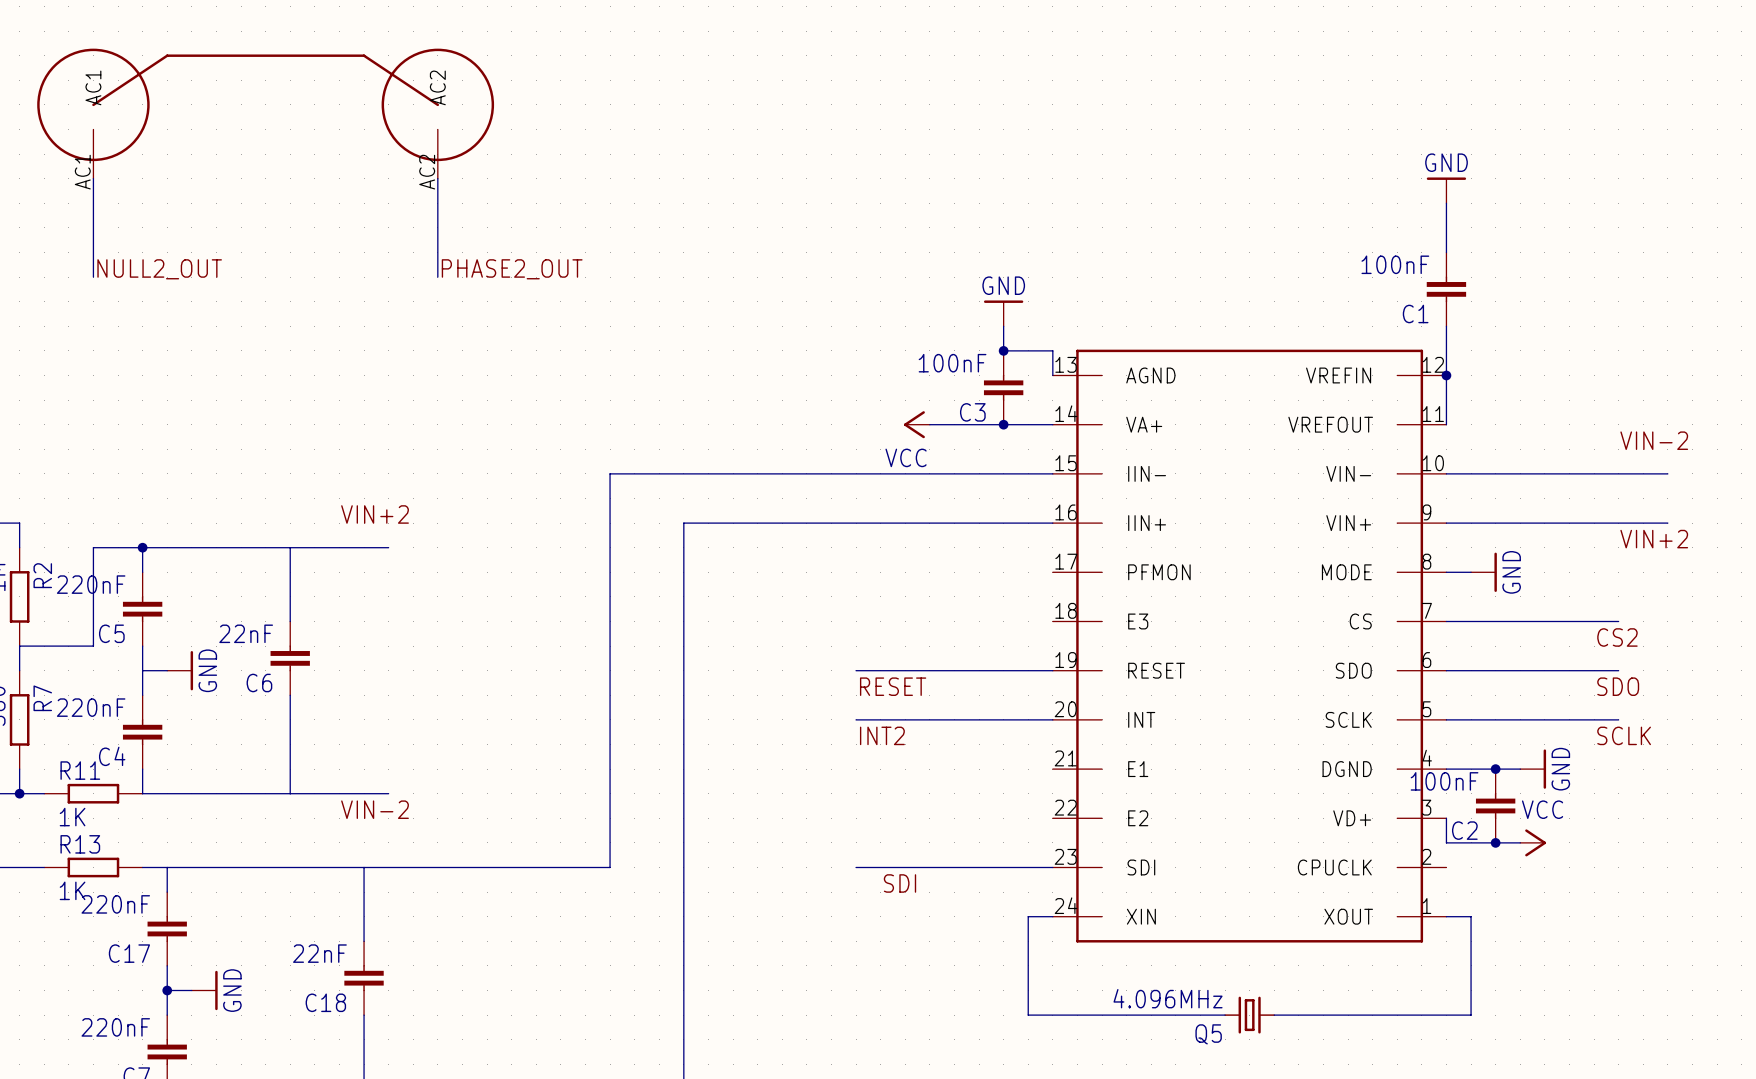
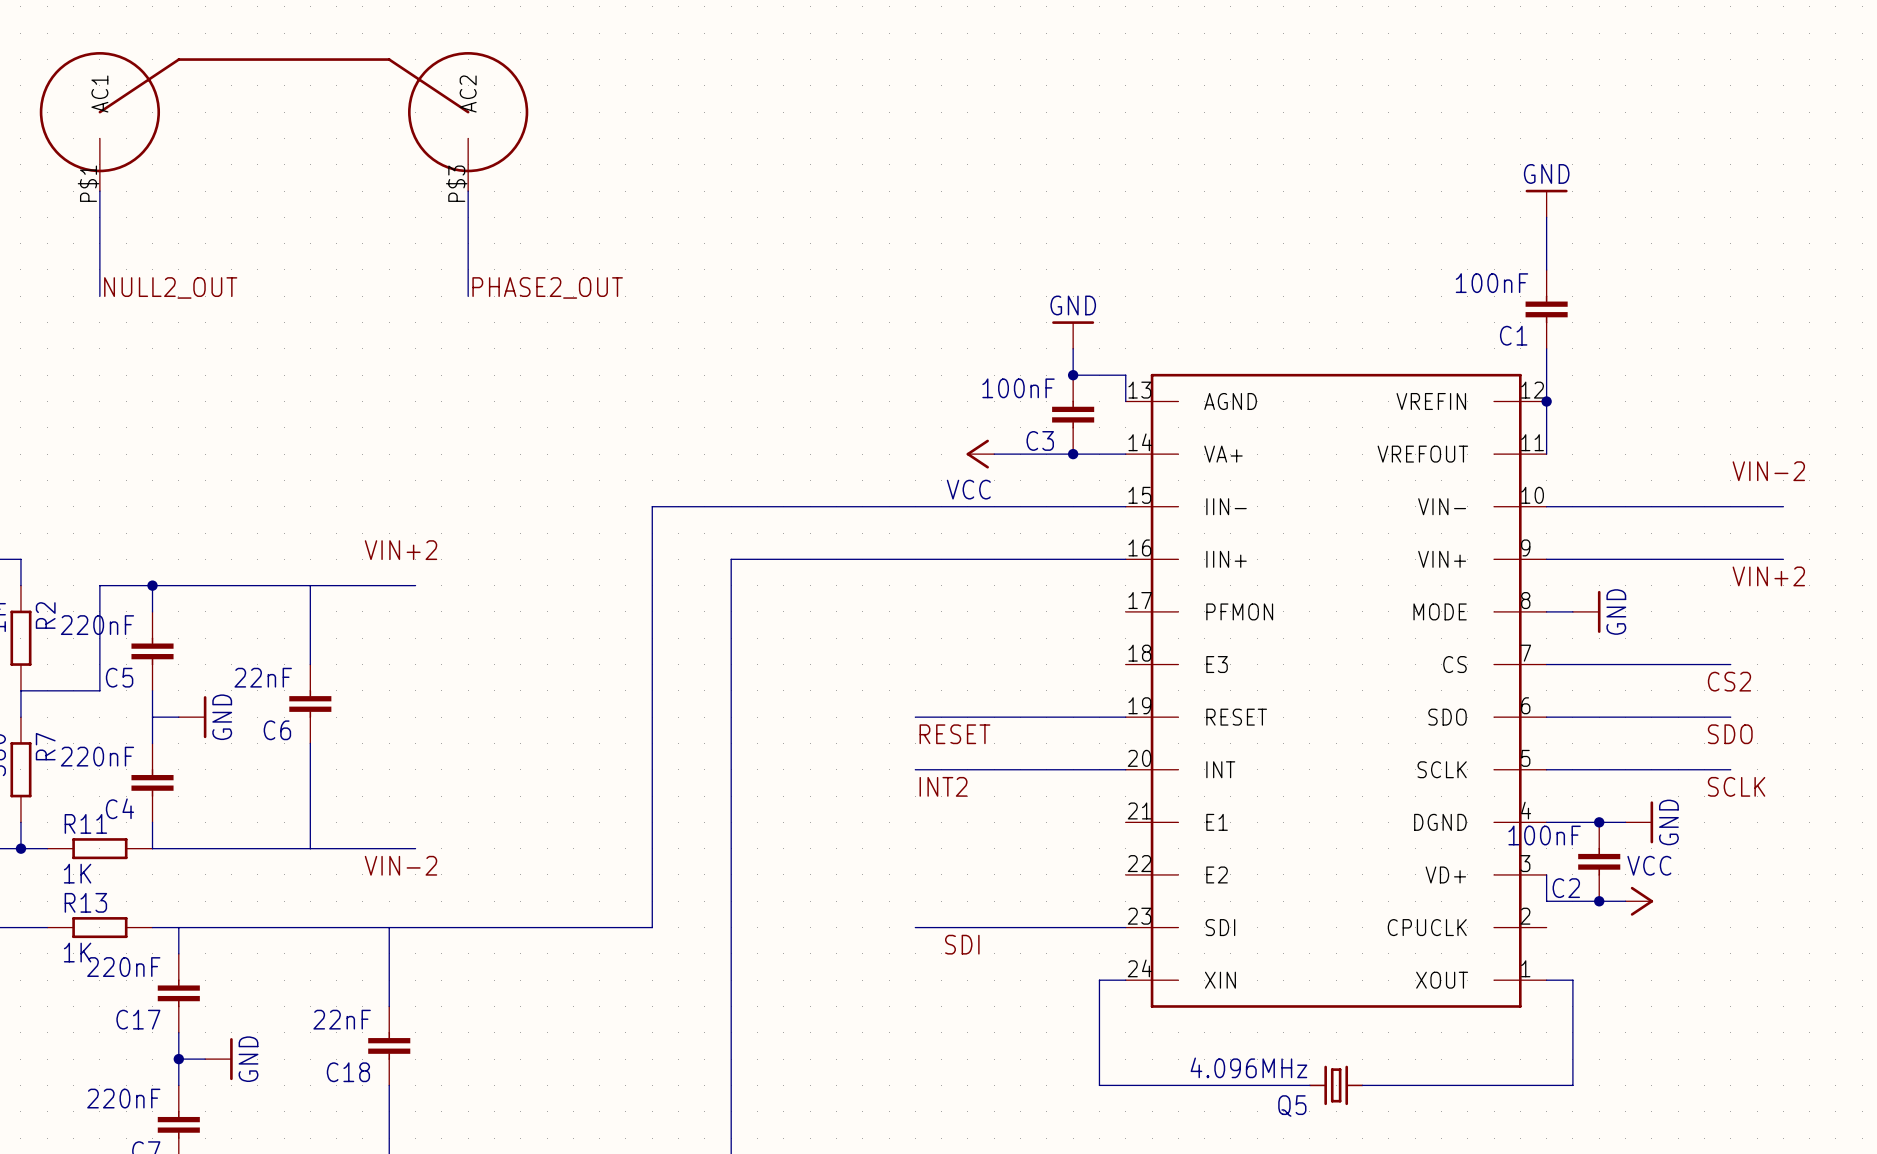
part pin number: AC1 (82, 172) -> P$1 (88, 183)
part pin number: AC2 (427, 172) -> P$3 (456, 183)

